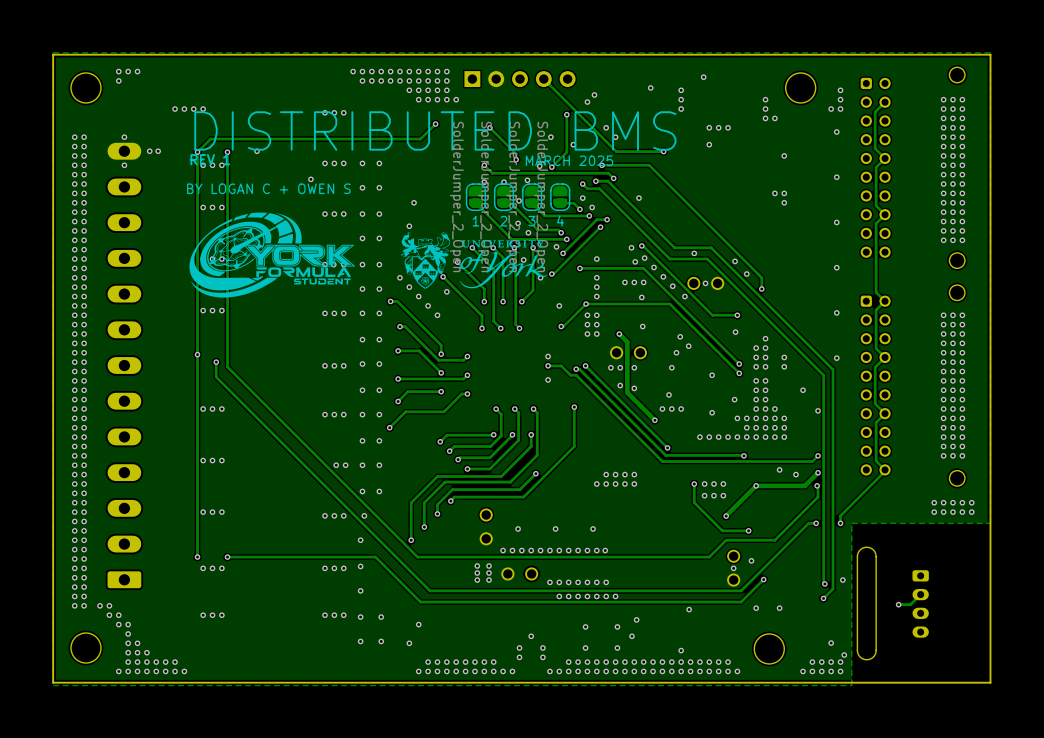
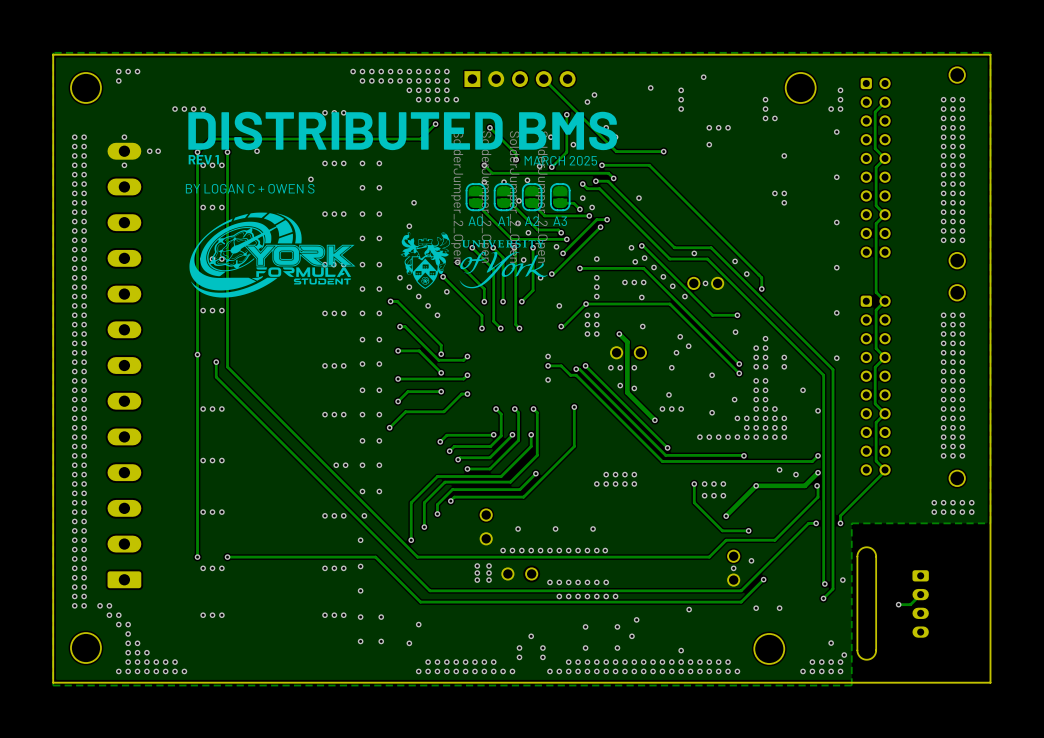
text: 4 (560, 220) -> A3 (560, 221)
text: 1 (475, 221) -> A0 (475, 221)
text: 2 (503, 221) -> A1 (503, 221)
text: 3 (531, 221) -> A2 (531, 221)

